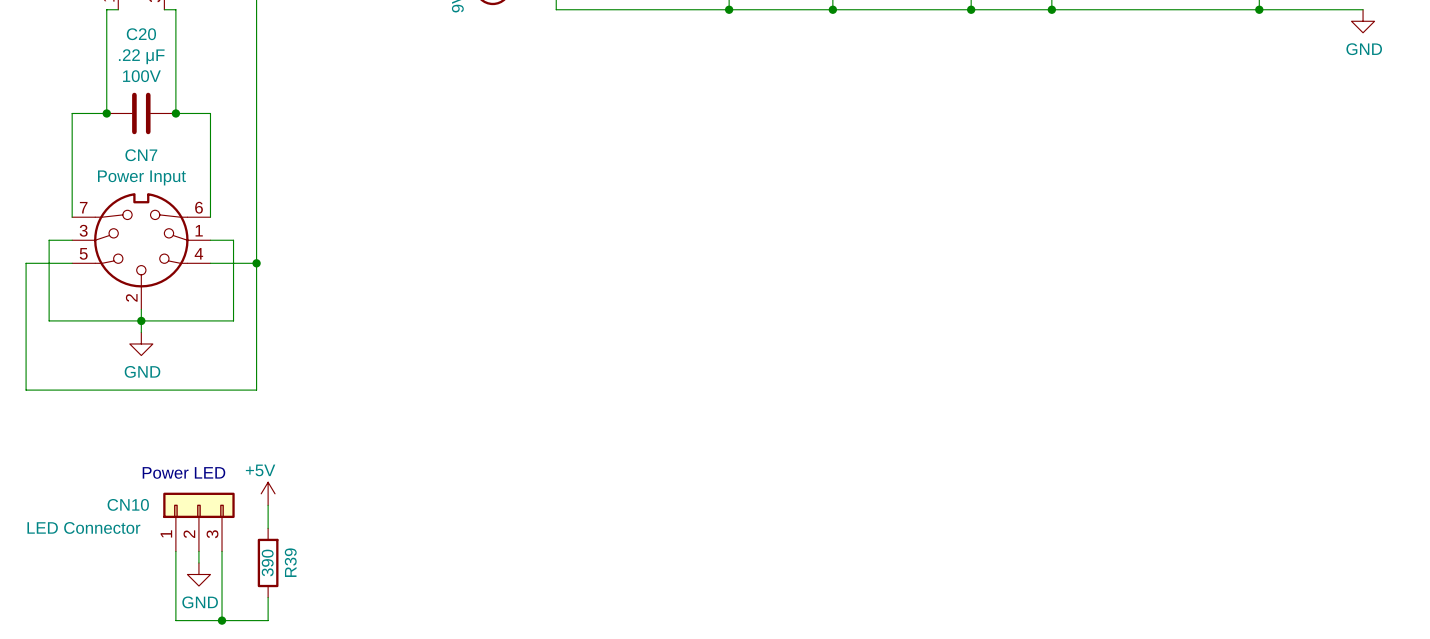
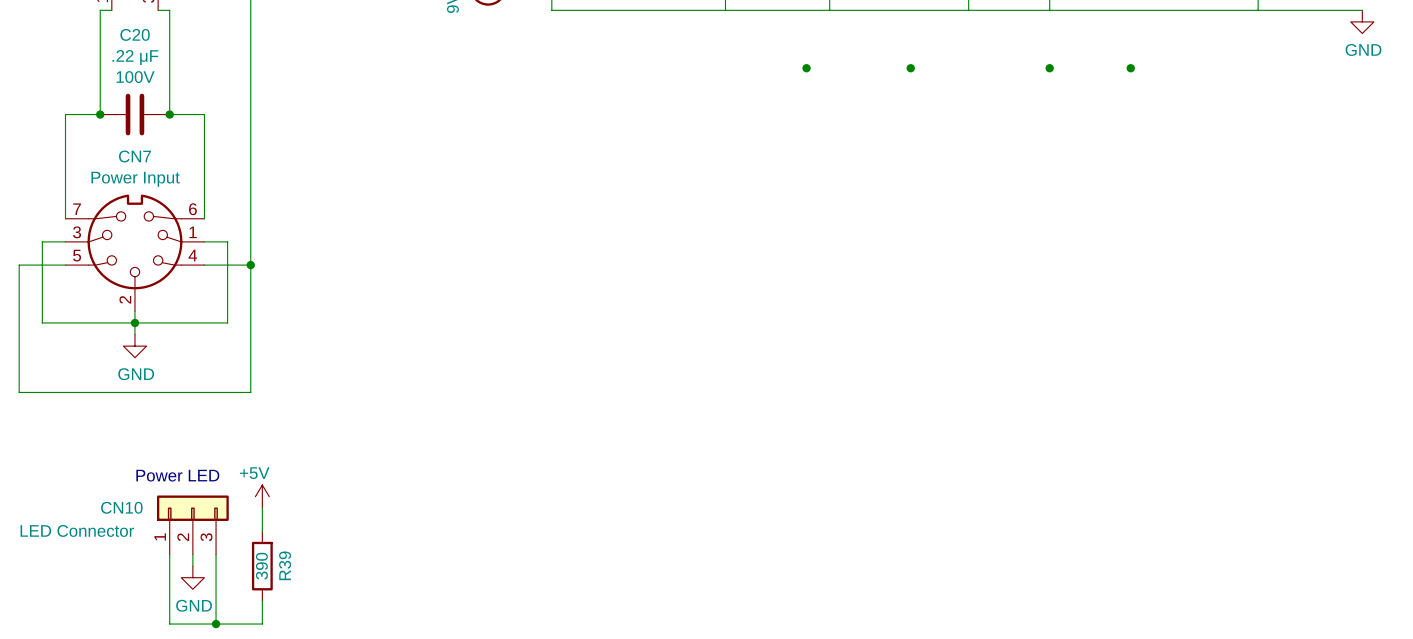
junction: (729, 9) -> none
junction: (832, 9) -> none
junction: (971, 9) -> none
junction: (1051, 9) -> none
junction: (1259, 9) -> none
junction: none -> (806, 68)
junction: none -> (910, 68)
junction: none -> (1049, 68)
junction: none -> (1130, 68)

